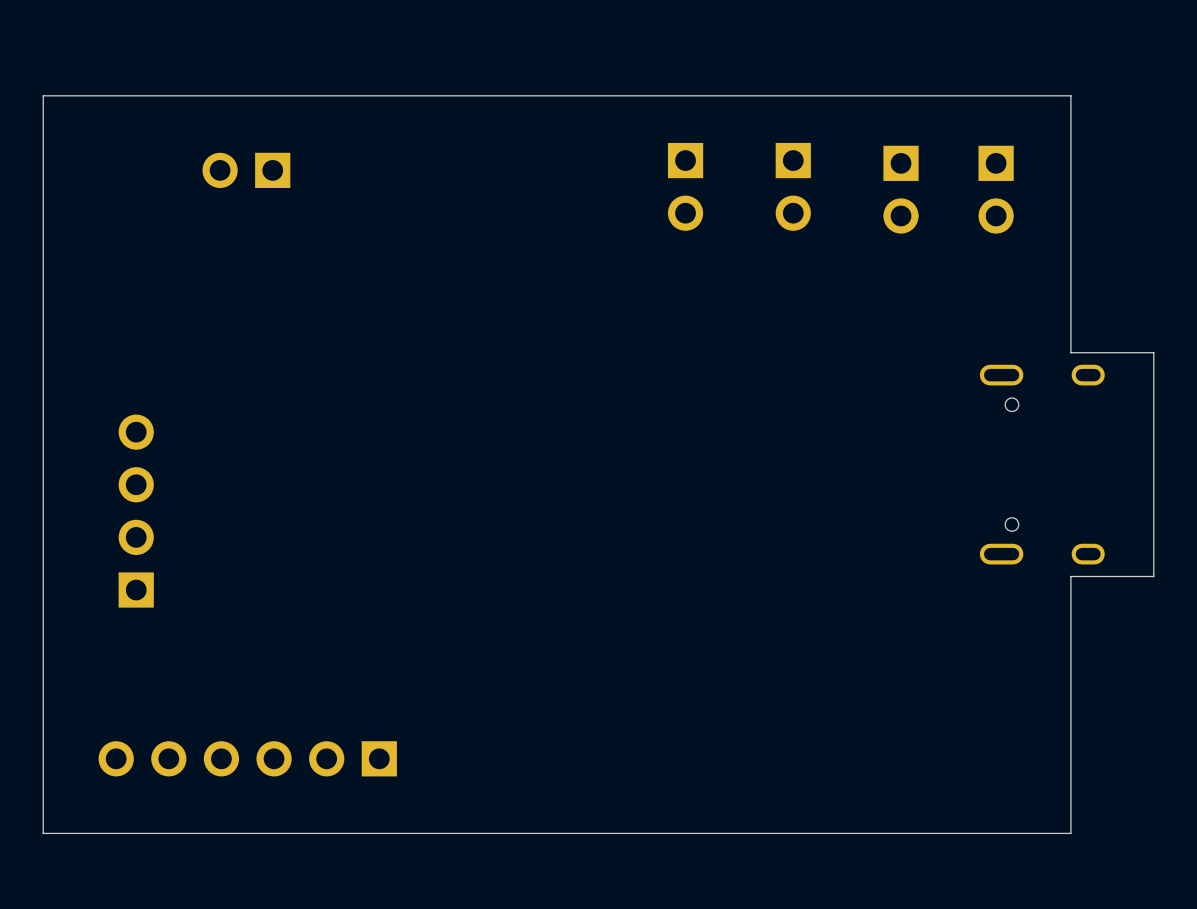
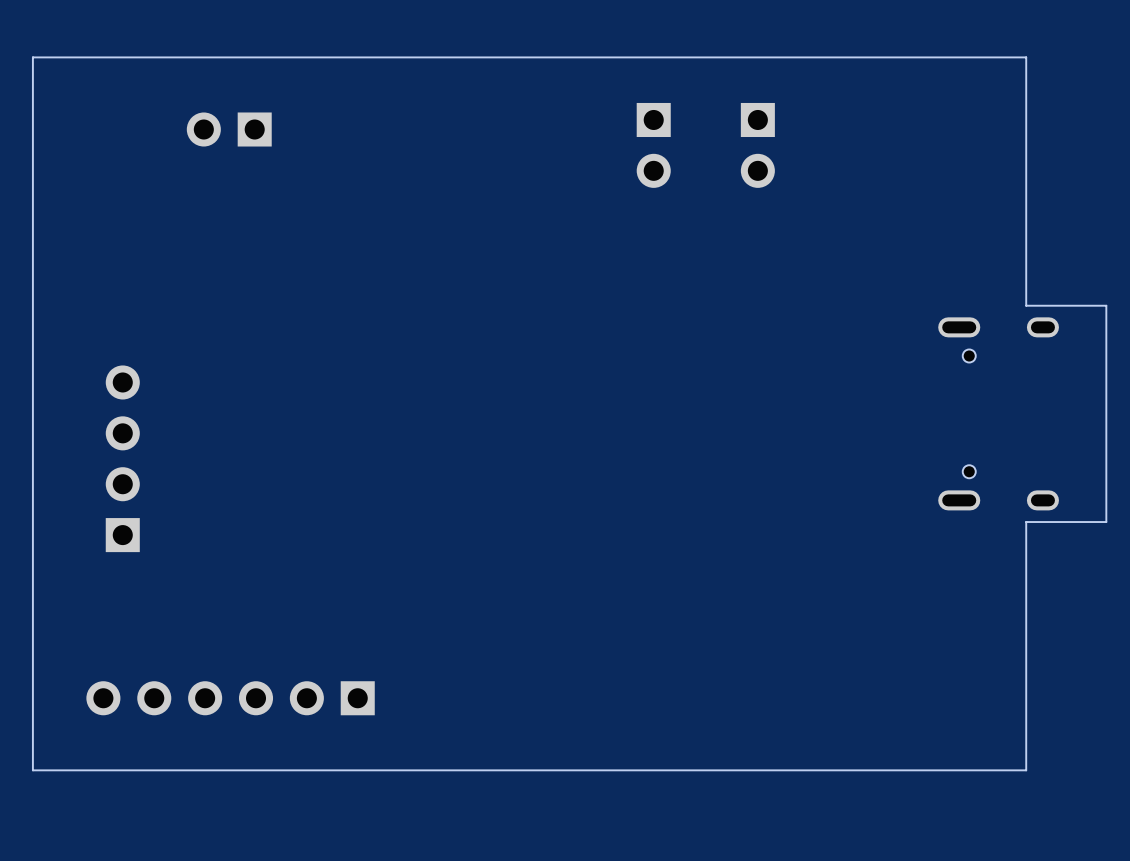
part: (901, 189) -> none
part: (996, 189) -> none

